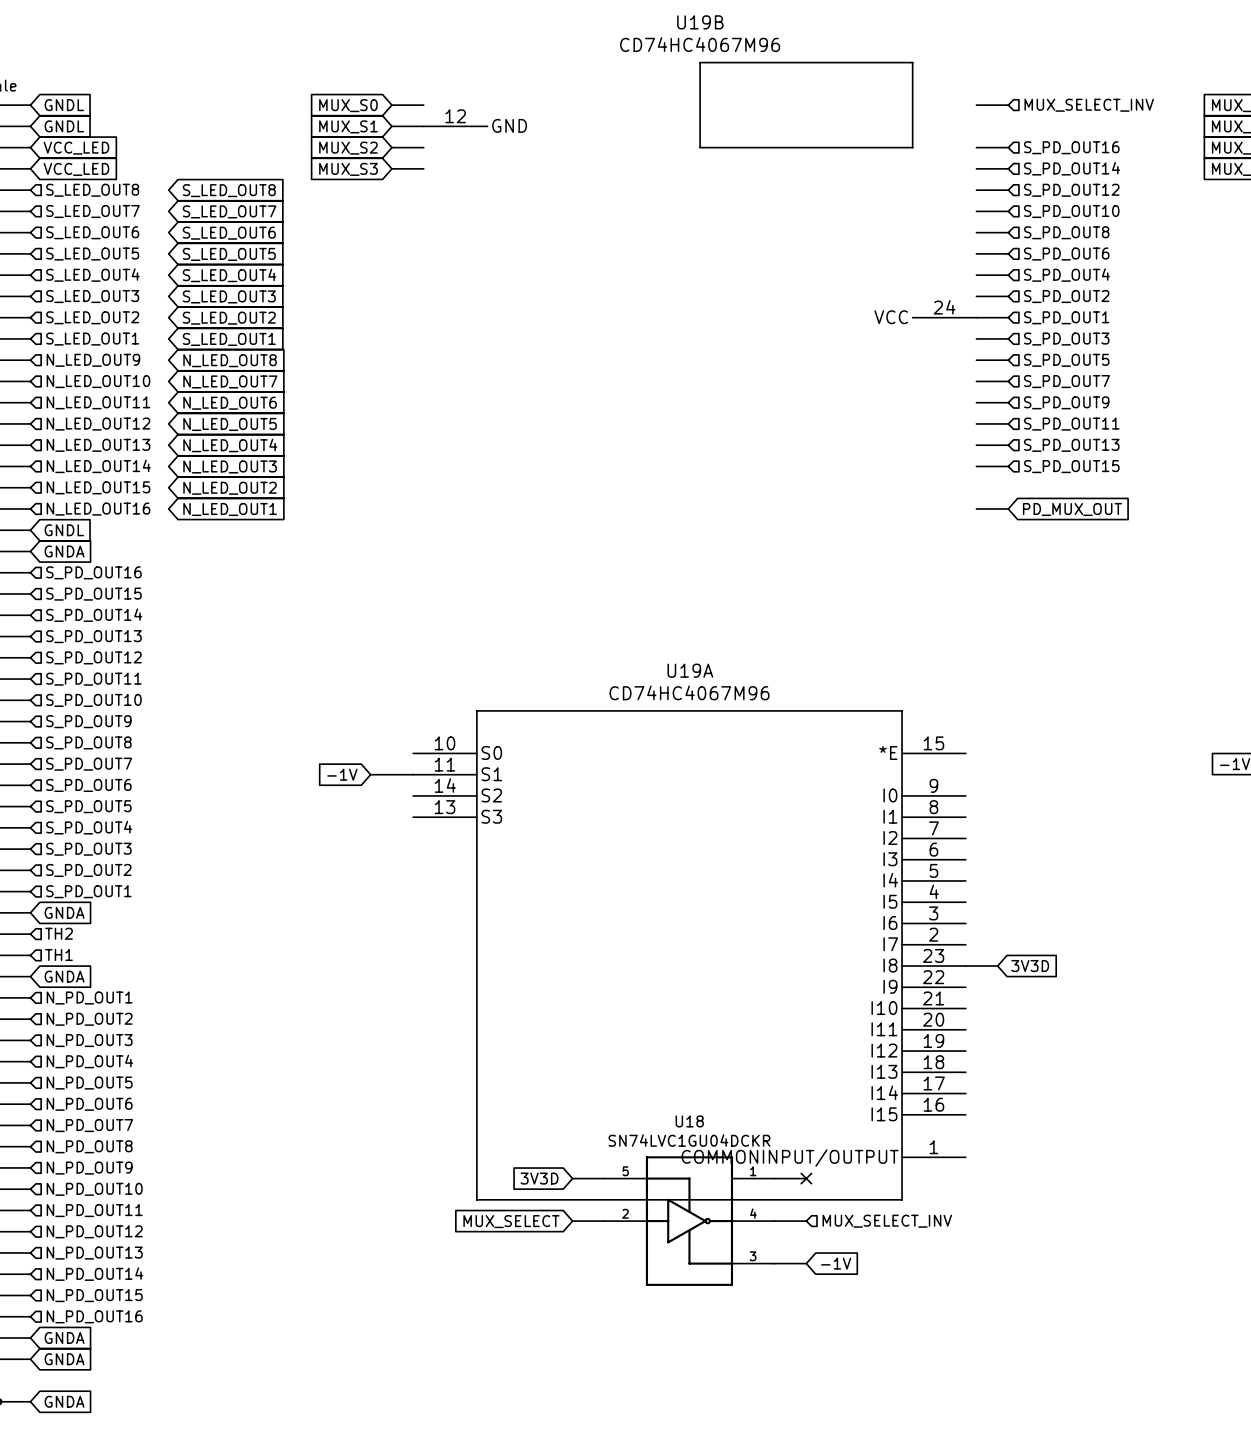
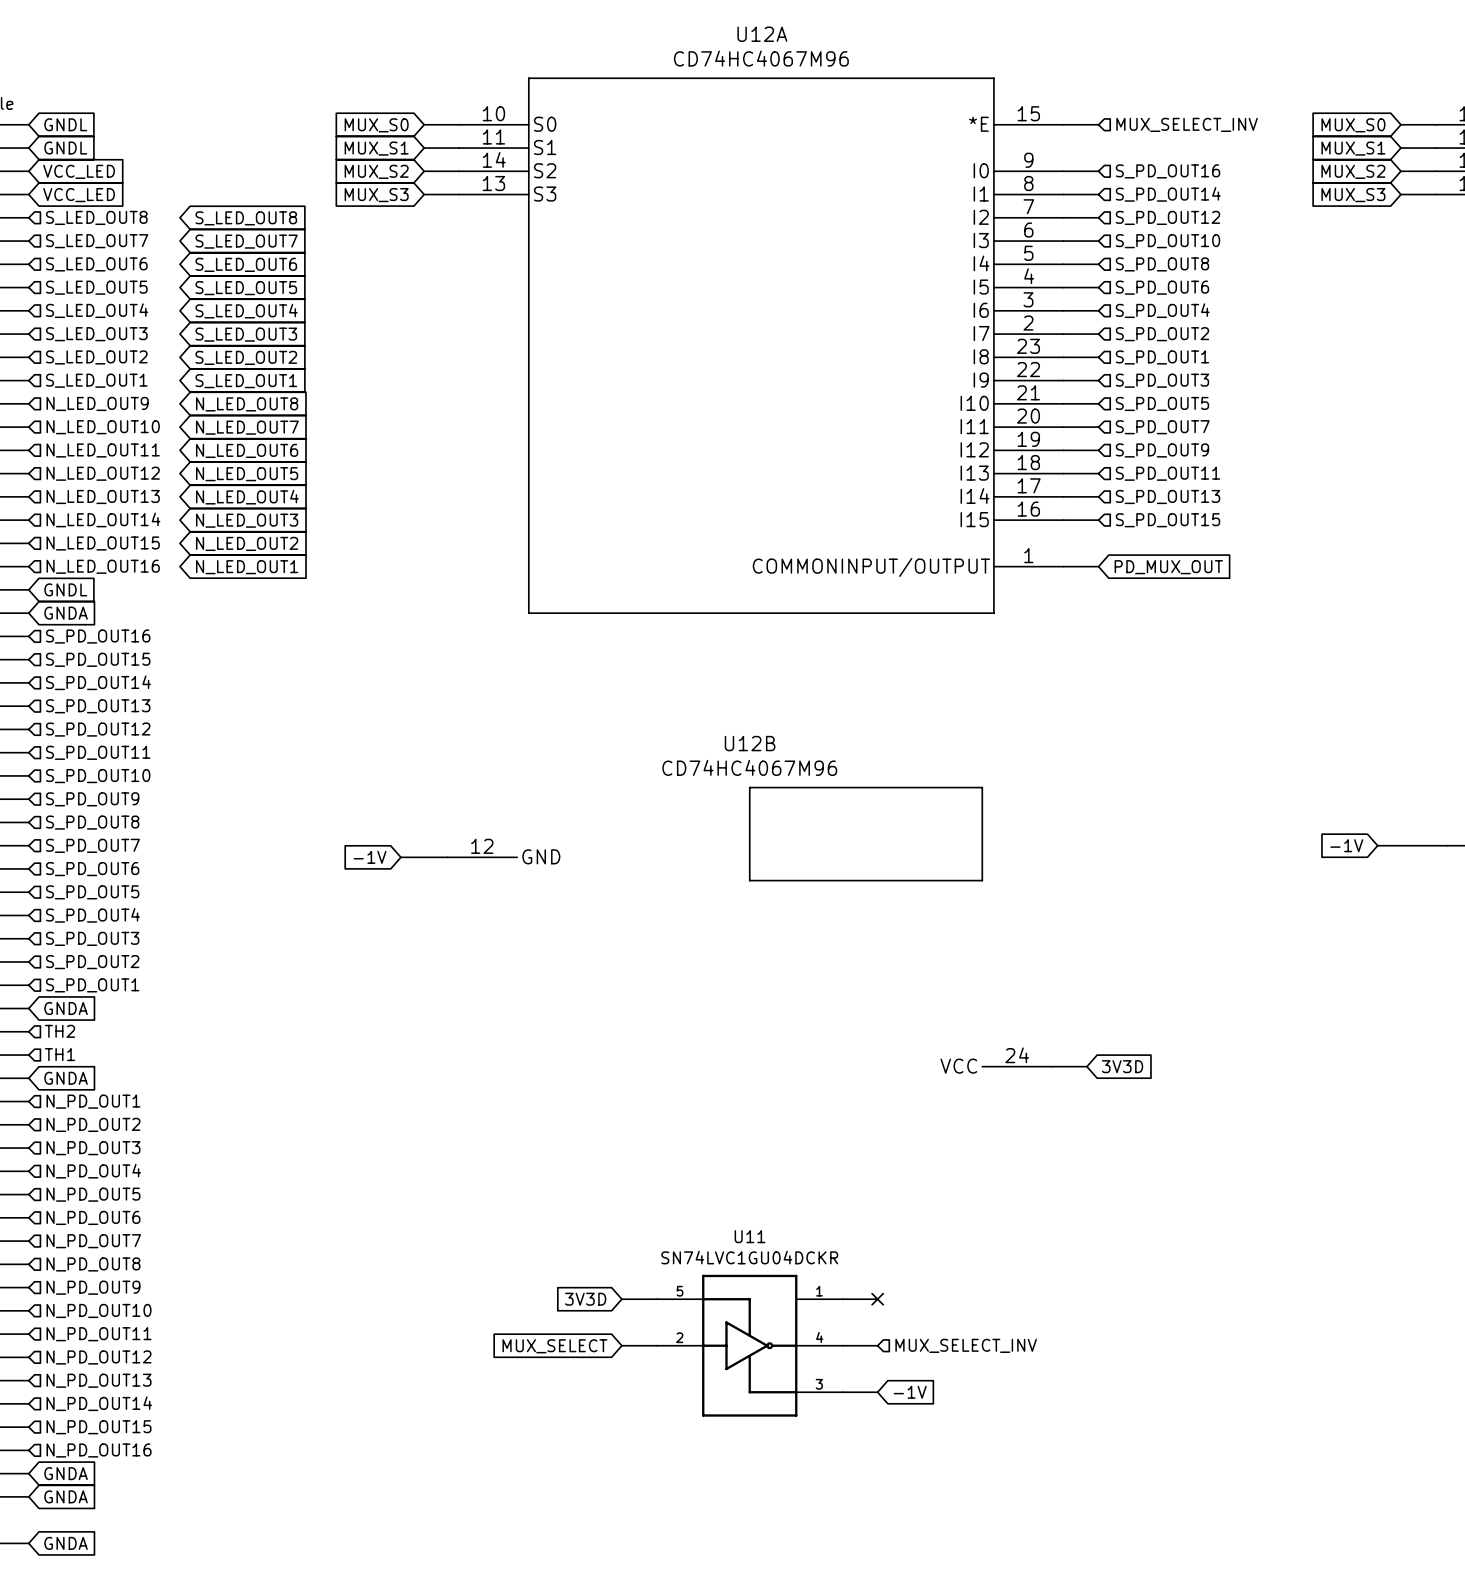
U19B: CD74HC4067M96 (700, 189) -> none
U12A: none -> CD74HC4067M96 (761, 345)
U12B: none -> CD74HC4067M96 (749, 926)
U19A: CD74HC4067M96 (689, 955) -> none
U18 name: U18 (689, 1121) -> U11 (750, 1236)

